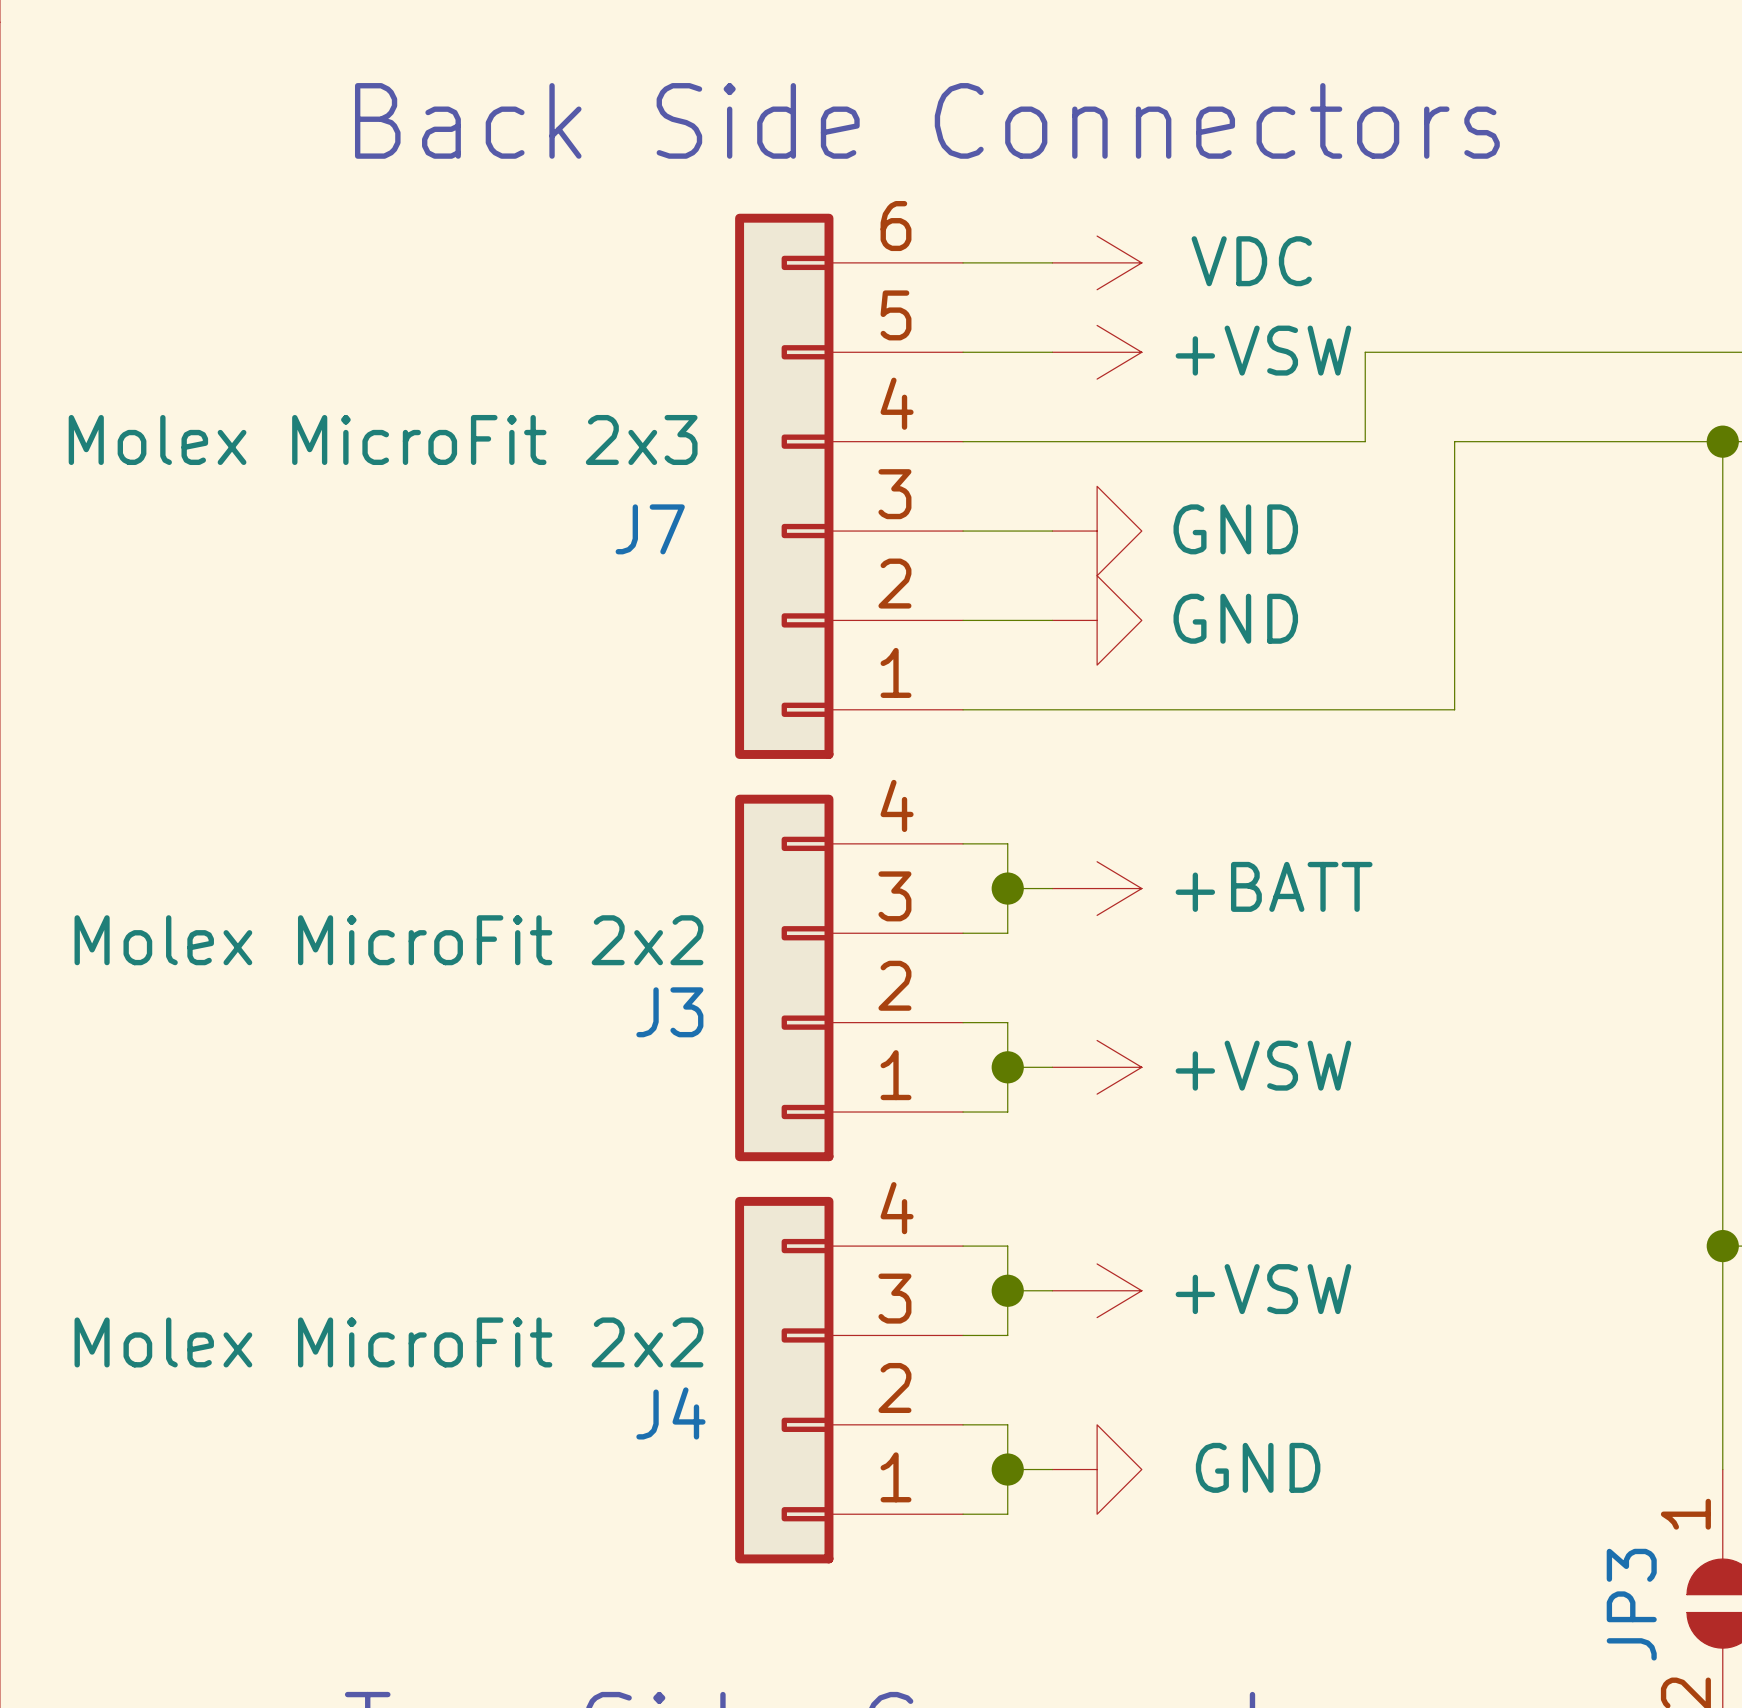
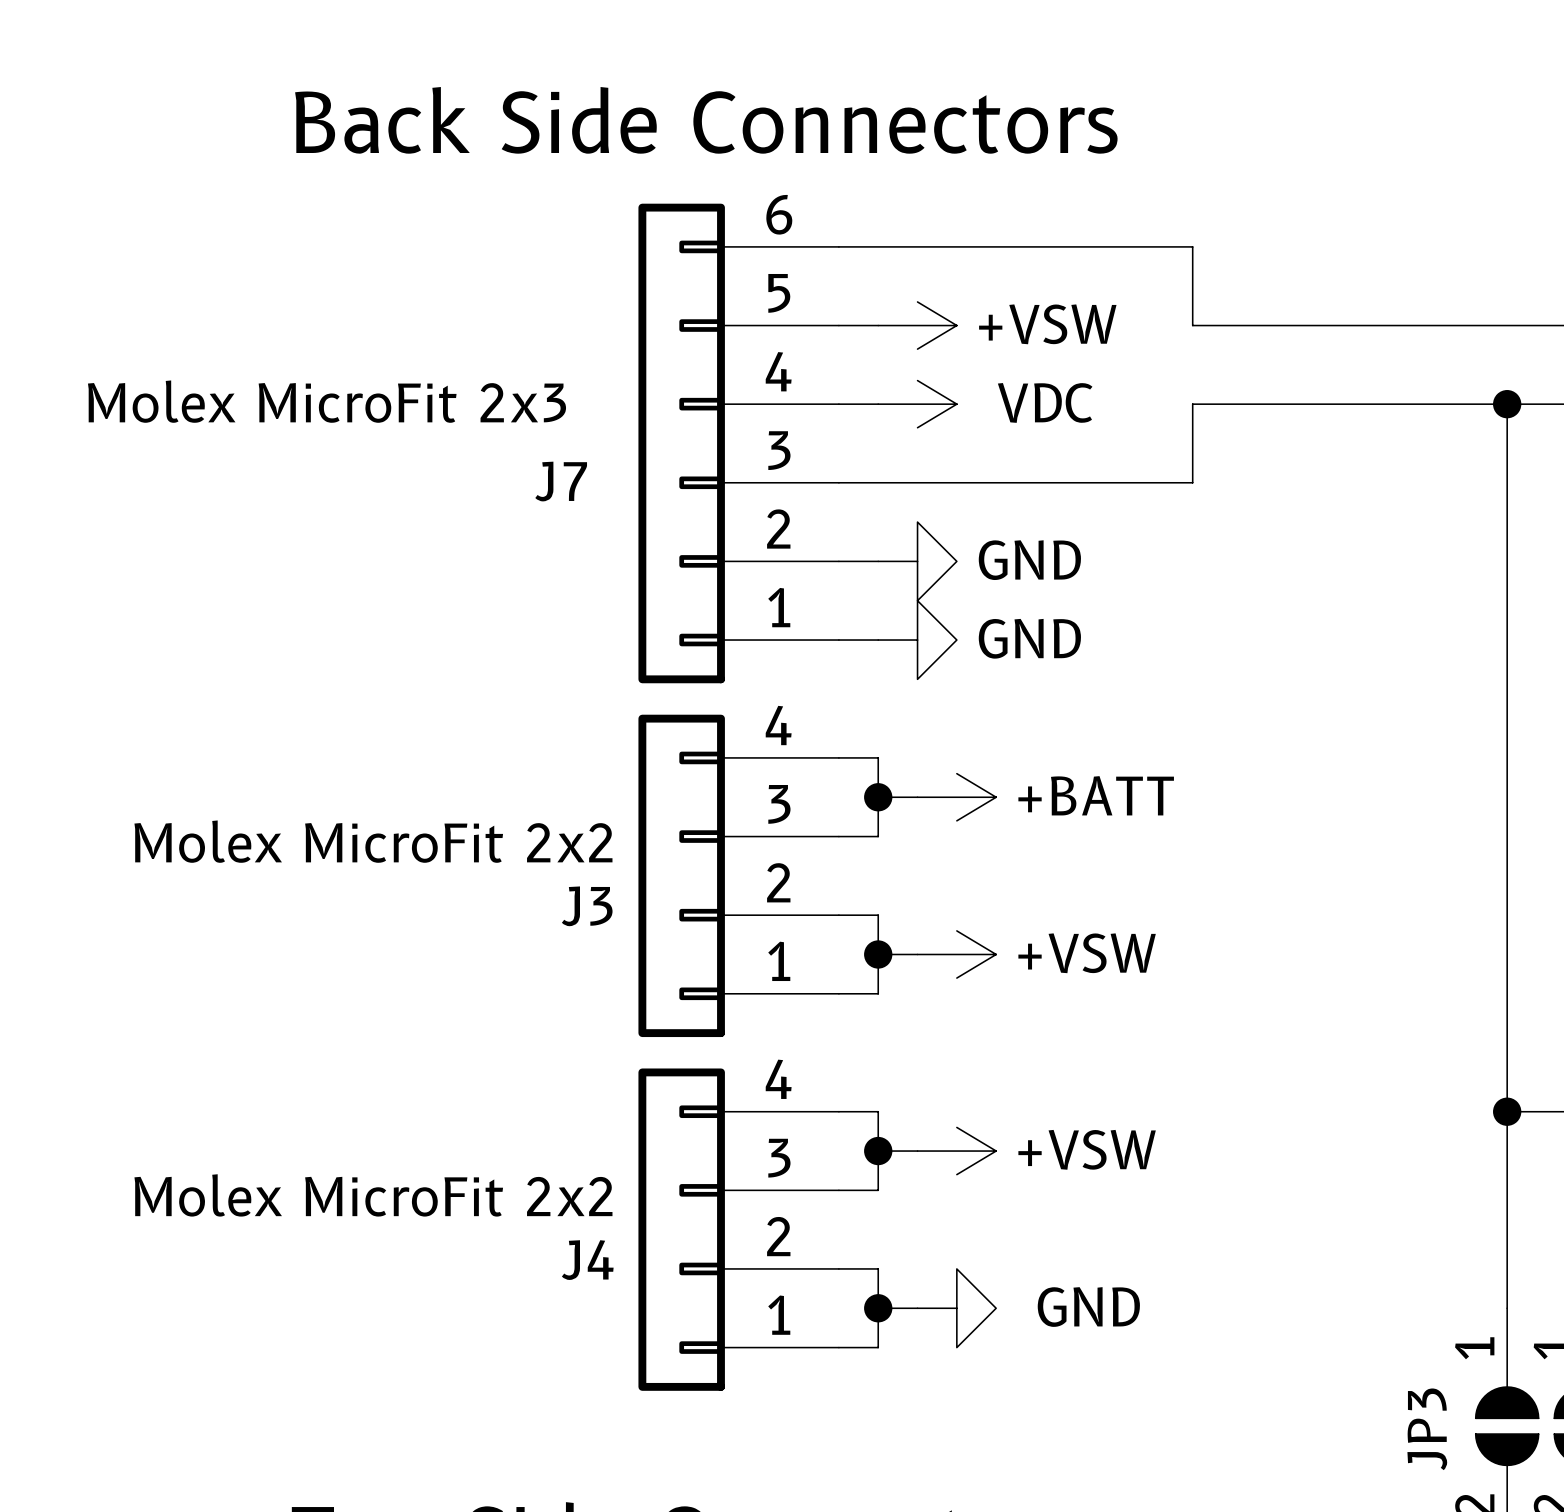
power symbol position: VDC (1097, 262) -> VDC (917, 404)
power symbol position: +VSW (1097, 352) -> +VSW (917, 325)
wire: (1365, 352) (1365, 441) (1007, 441) -> (1192, 325) (1192, 246) (917, 246)
wire: (1454, 441) (1454, 709) (1007, 709) -> (1271, 404) (1192, 404) (1192, 482) (917, 482)
power symbol: GND (1097, 531) -> none
power symbol position: GND (1097, 620) -> GND (917, 561)
power symbol: none -> GND (917, 640)

